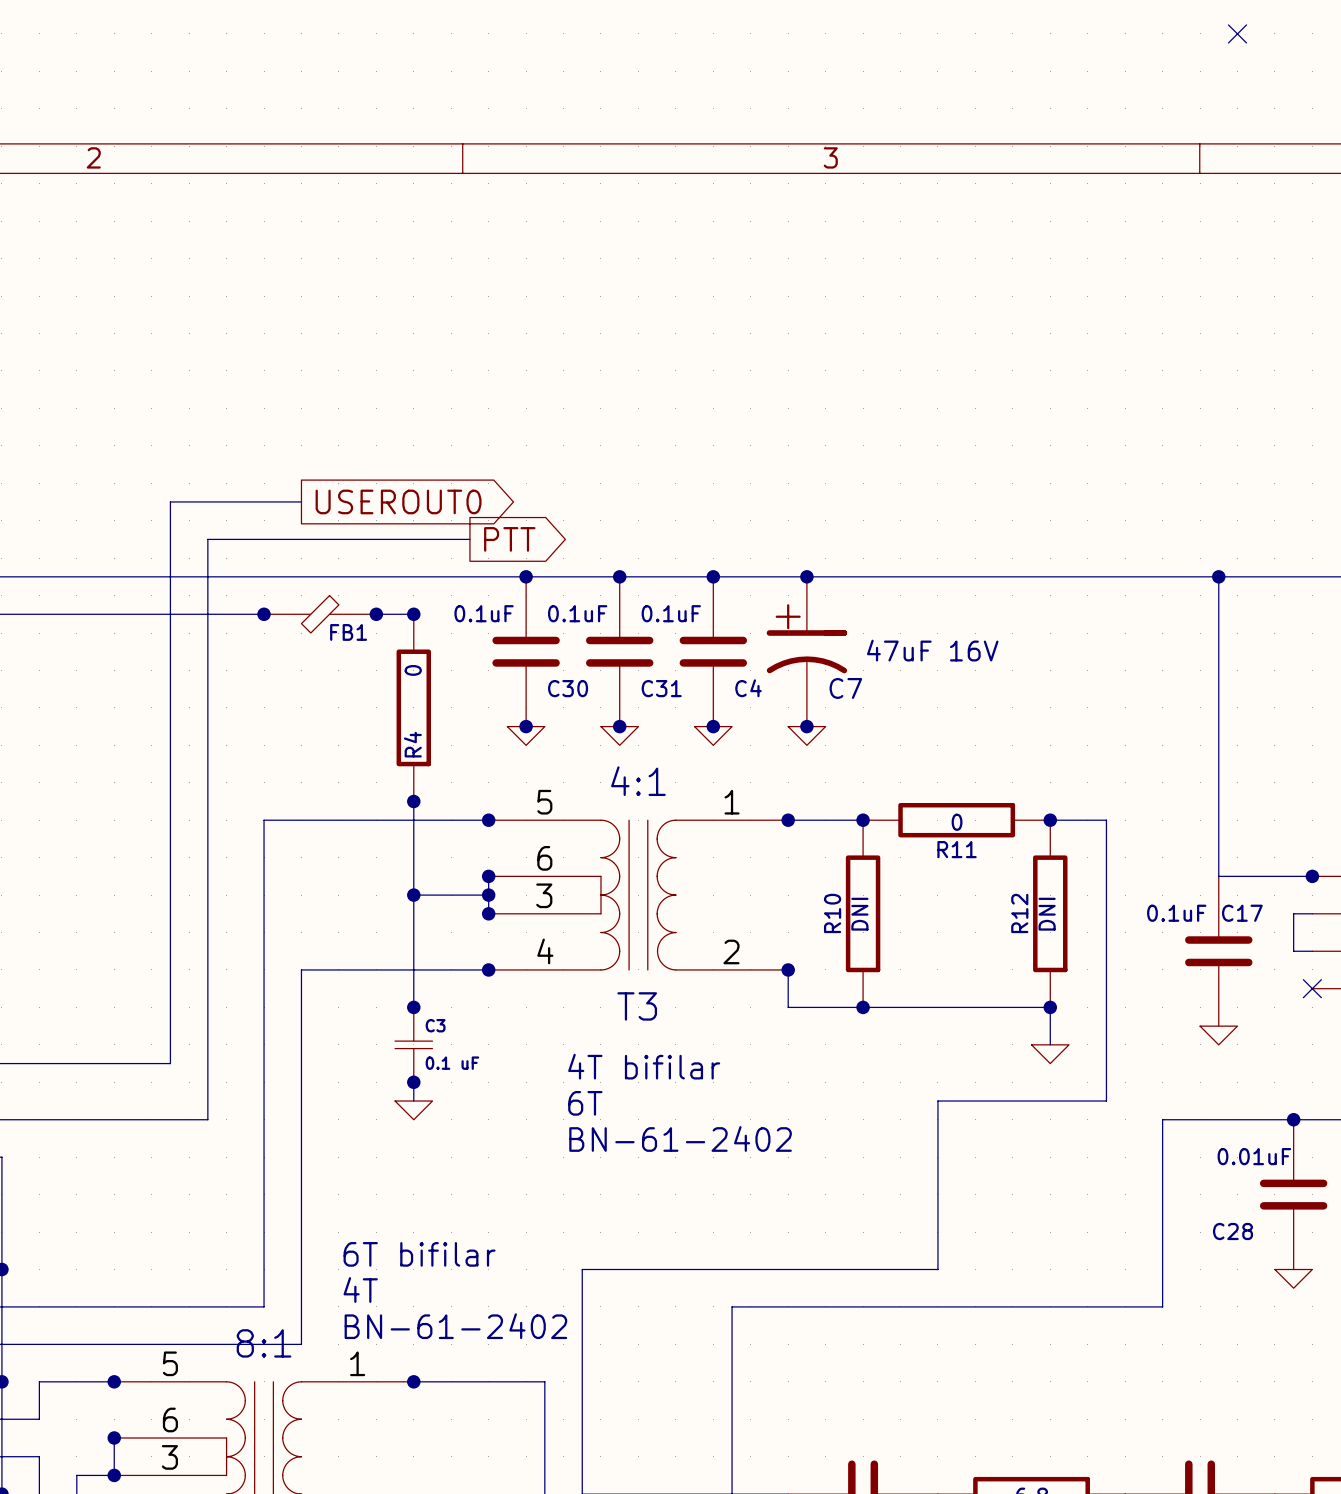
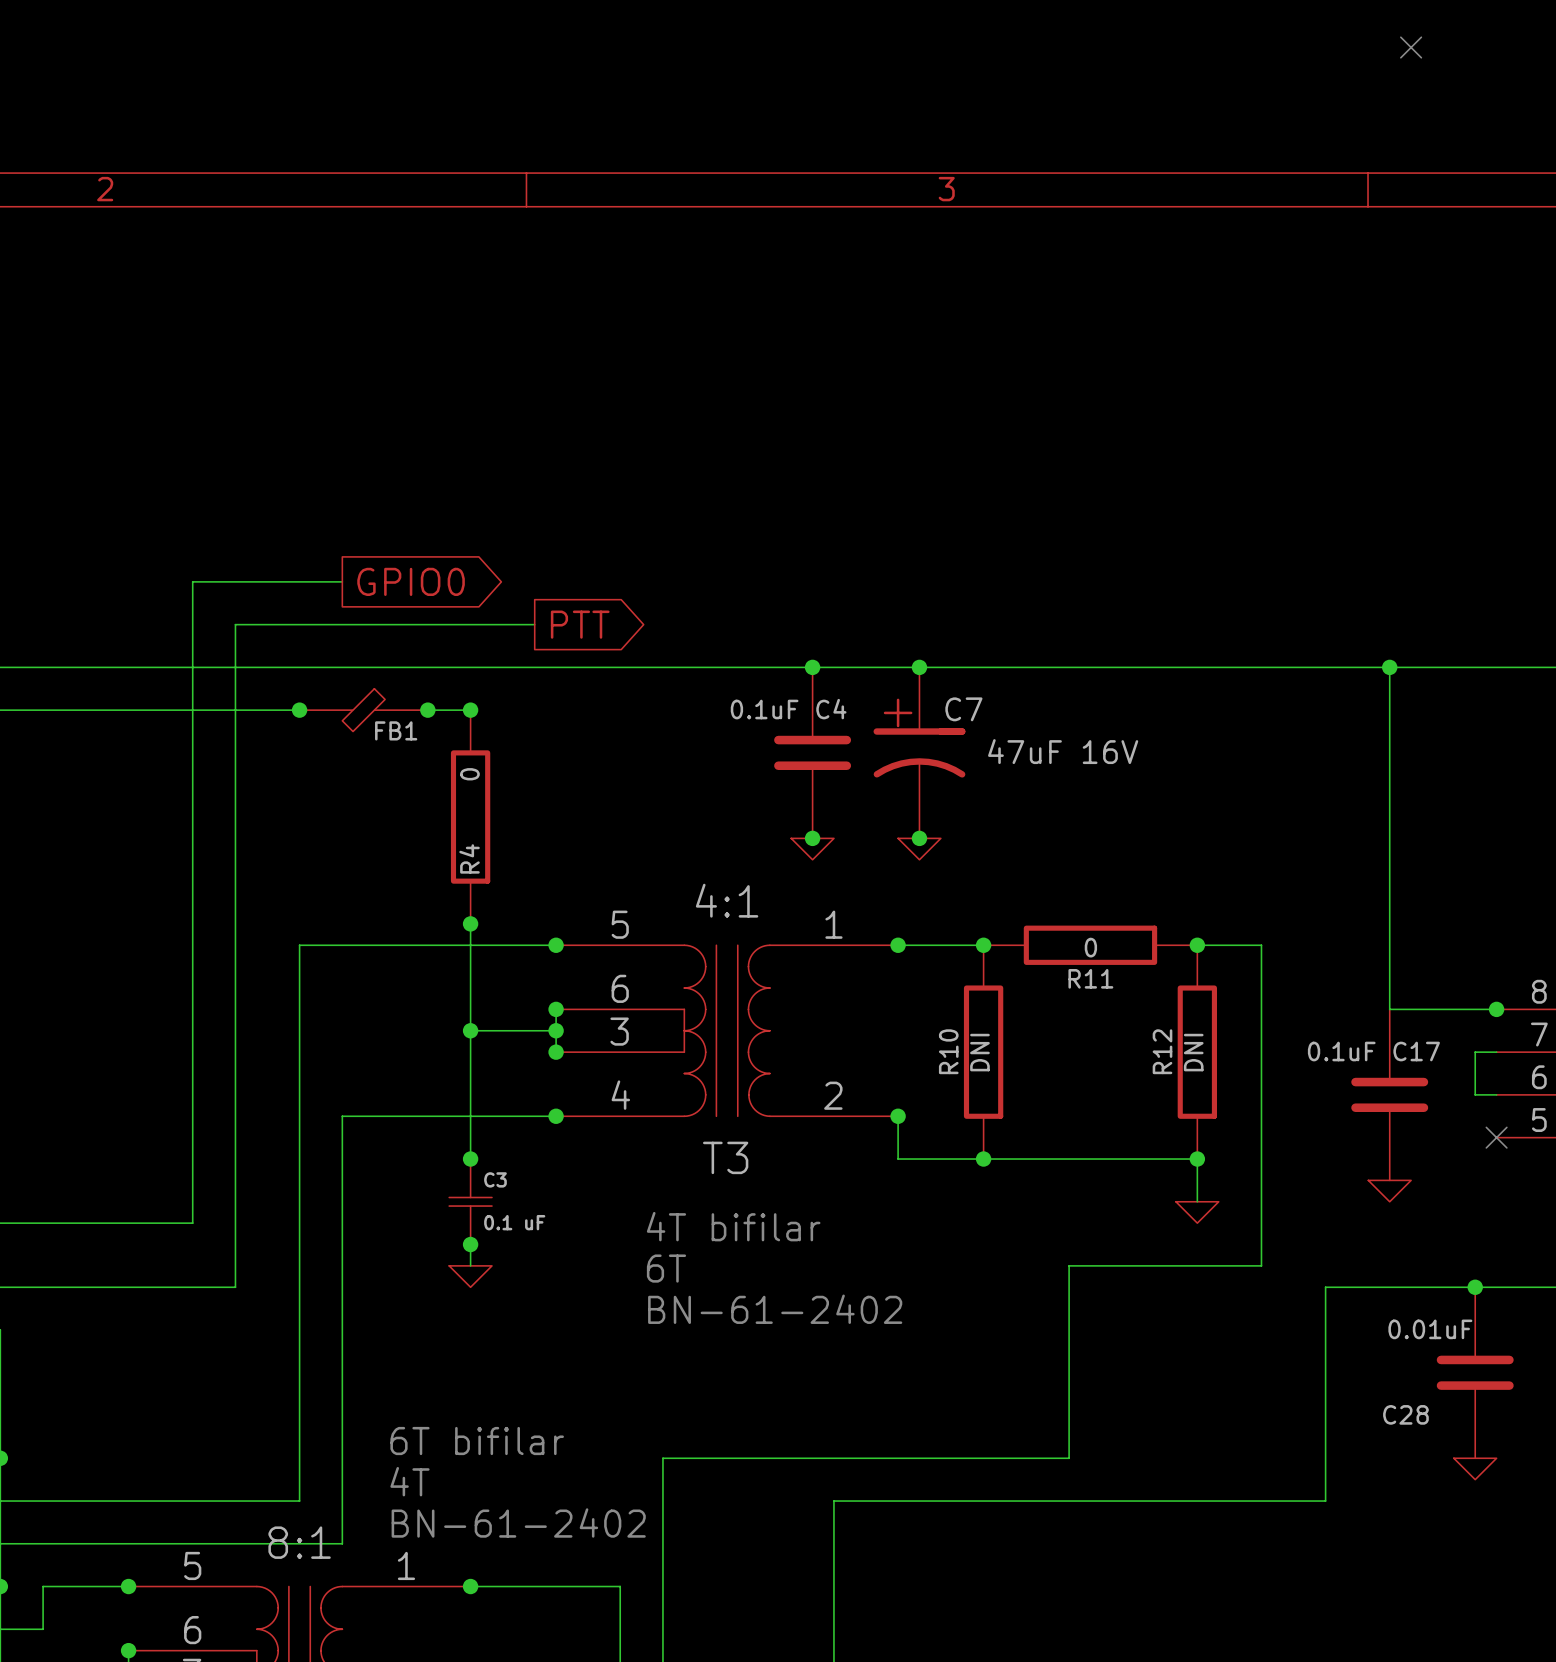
global label: USEROUT0 (398, 501) -> GPIO0 (411, 581)
junction: (526, 576) -> none
junction: (619, 576) -> none
C30: 0.1uF (526, 651) -> none
C31: 0.1uF (619, 651) -> none
C4 name position: C4 (748, 688) -> C4 (831, 709)
C7 name position: C7 (845, 688) -> C7 (963, 709)
junction: (526, 726) -> none
junction: (619, 726) -> none
power symbol: (526, 735) -> none
power symbol: (619, 735) -> none

